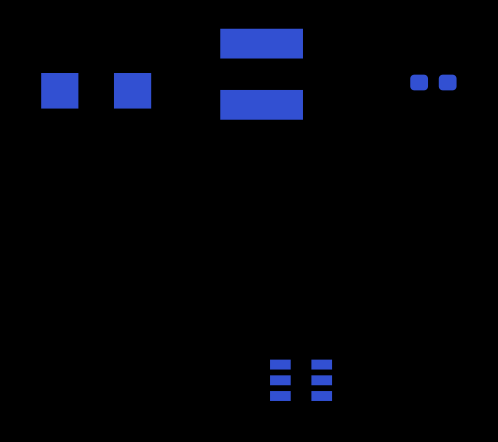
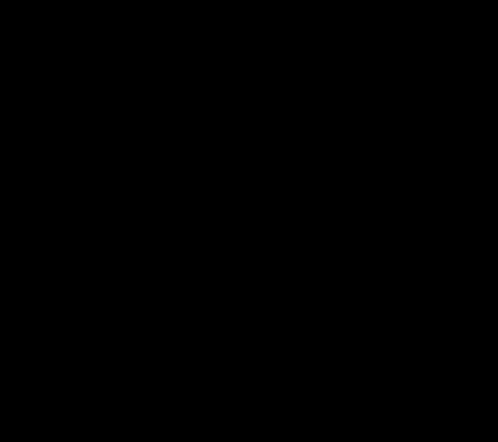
part: (261, 74) -> none
part: (433, 82) -> none
part: (96, 90) -> none
part: (301, 380) -> none

